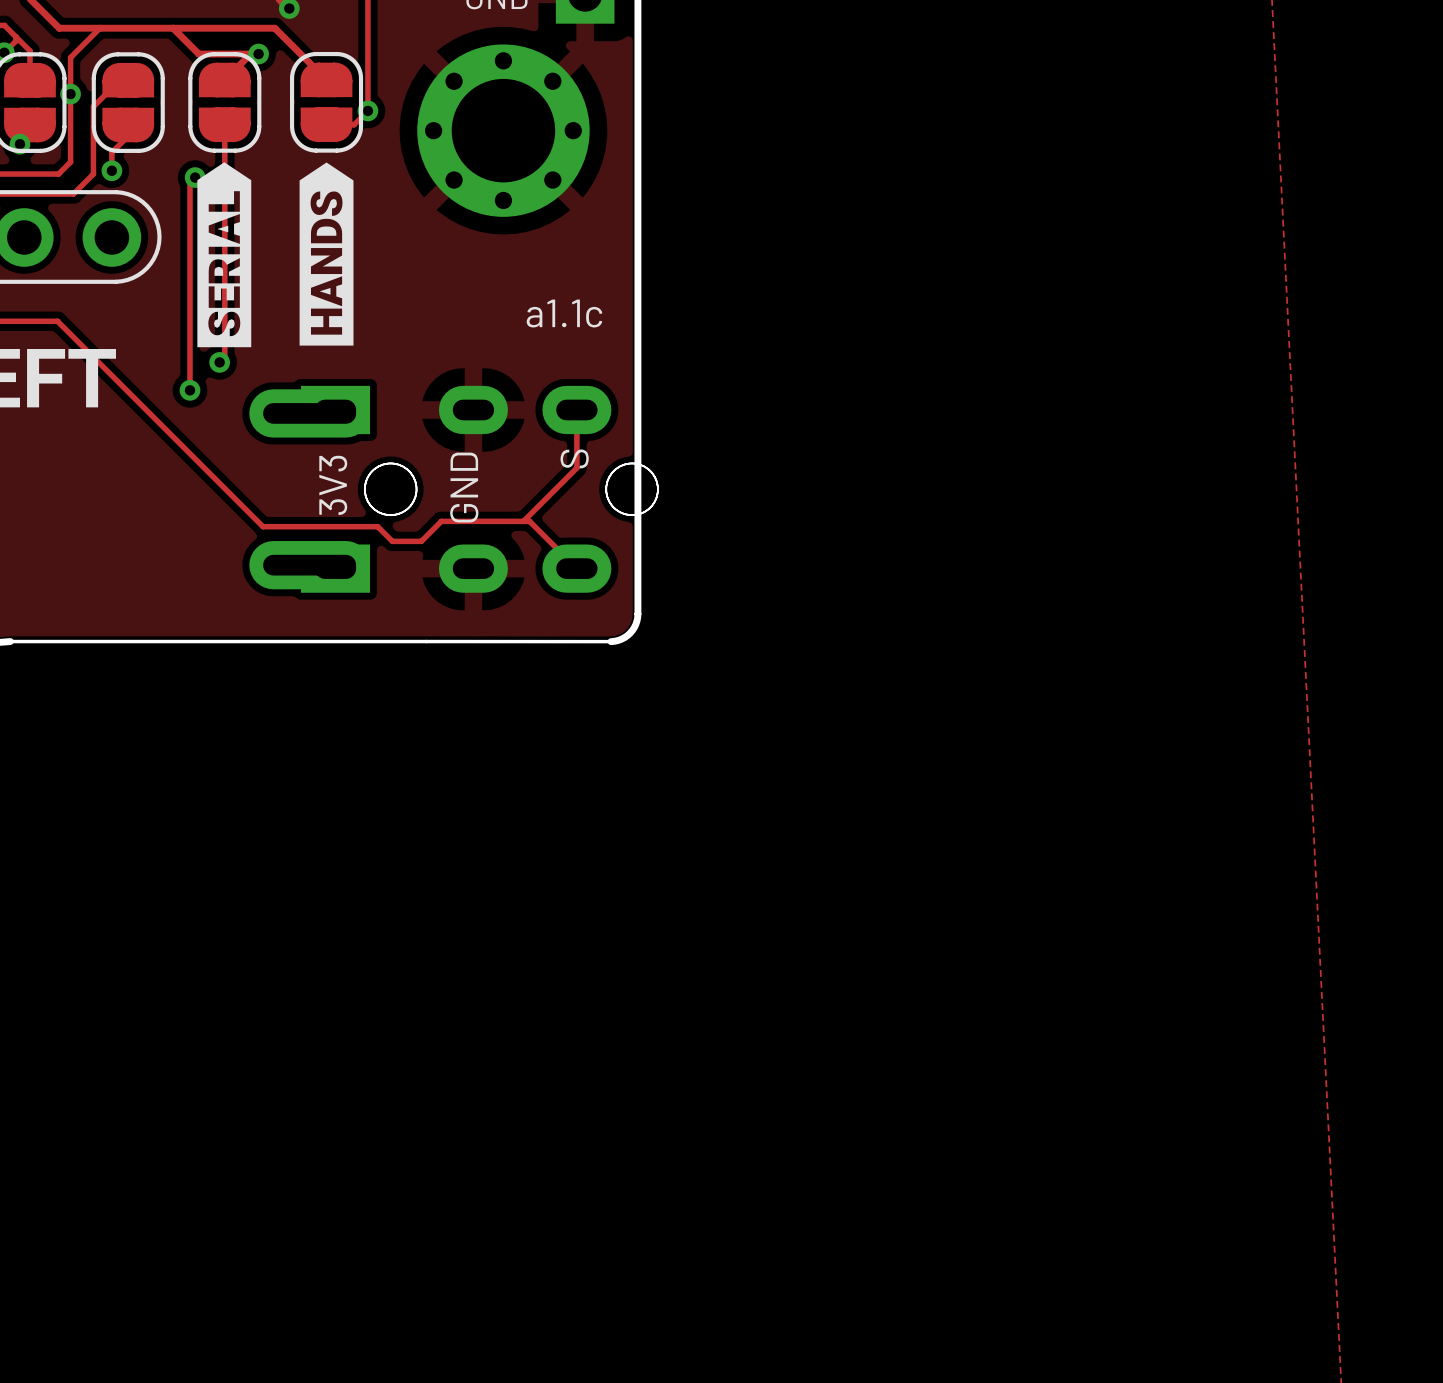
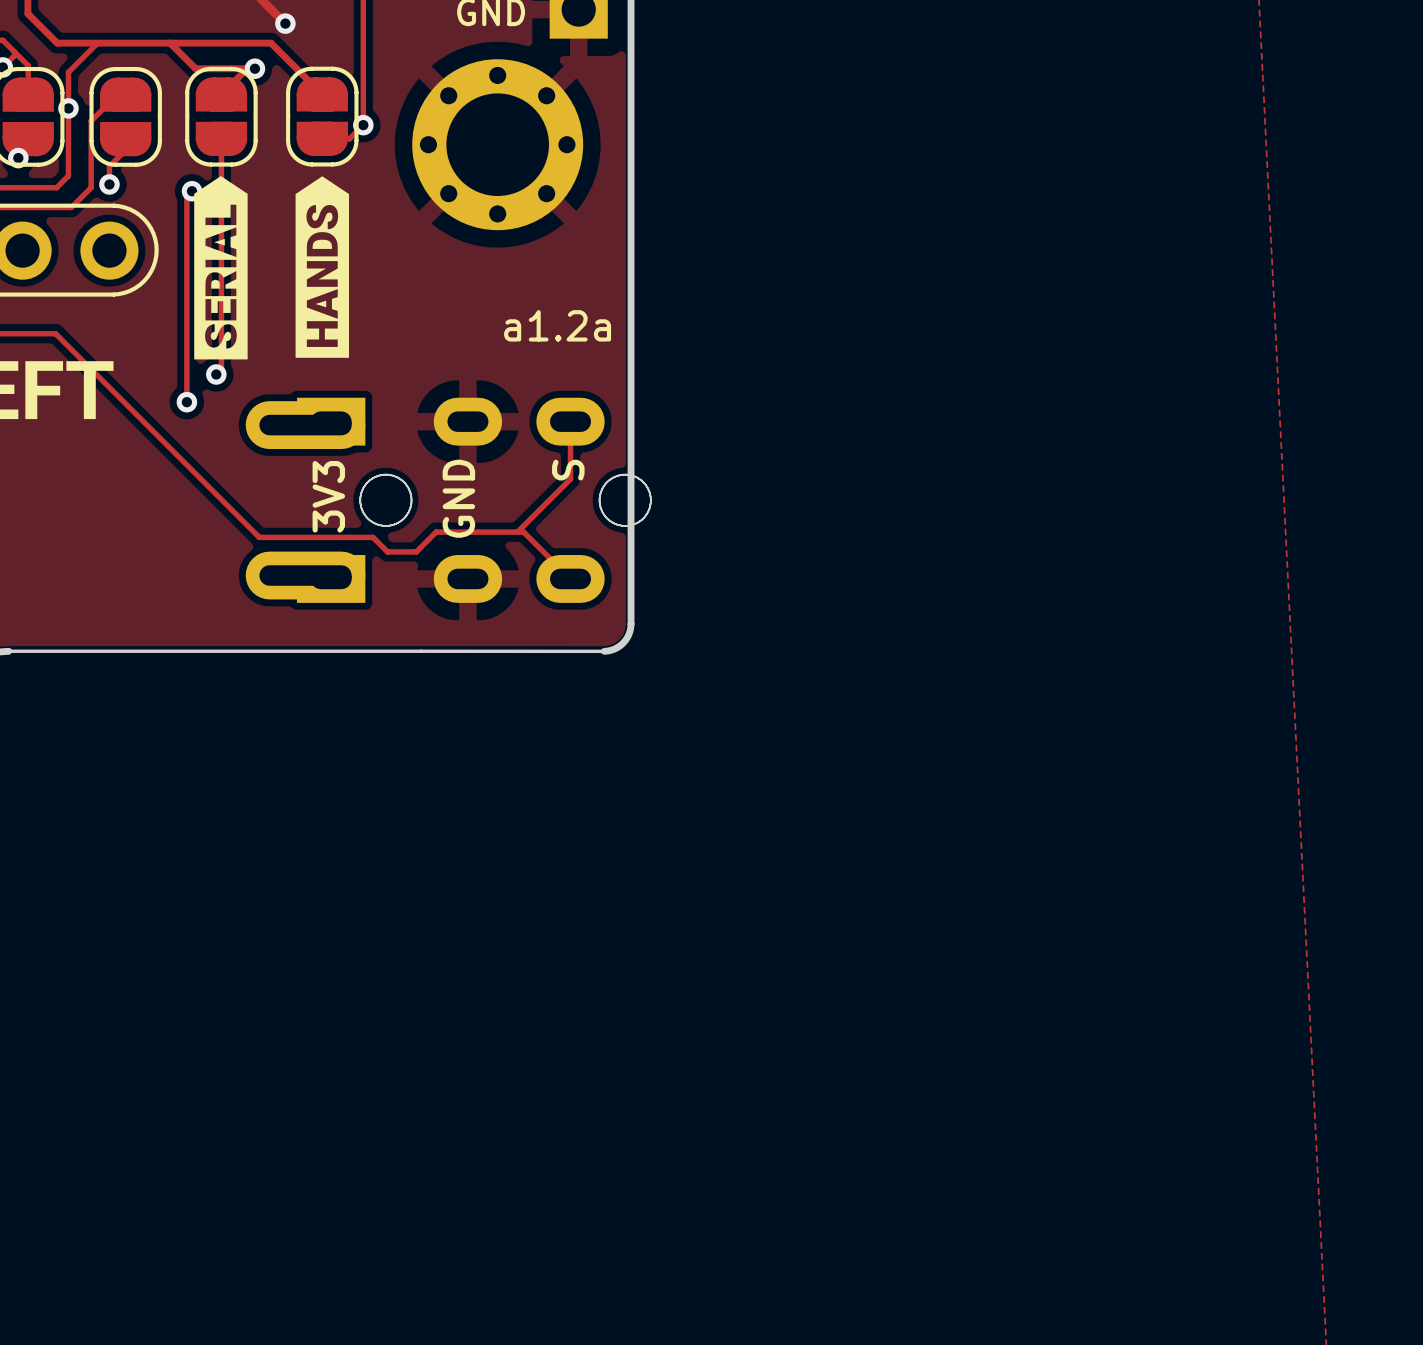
text: a1.1c (564, 313) -> a1.2a (557, 325)

